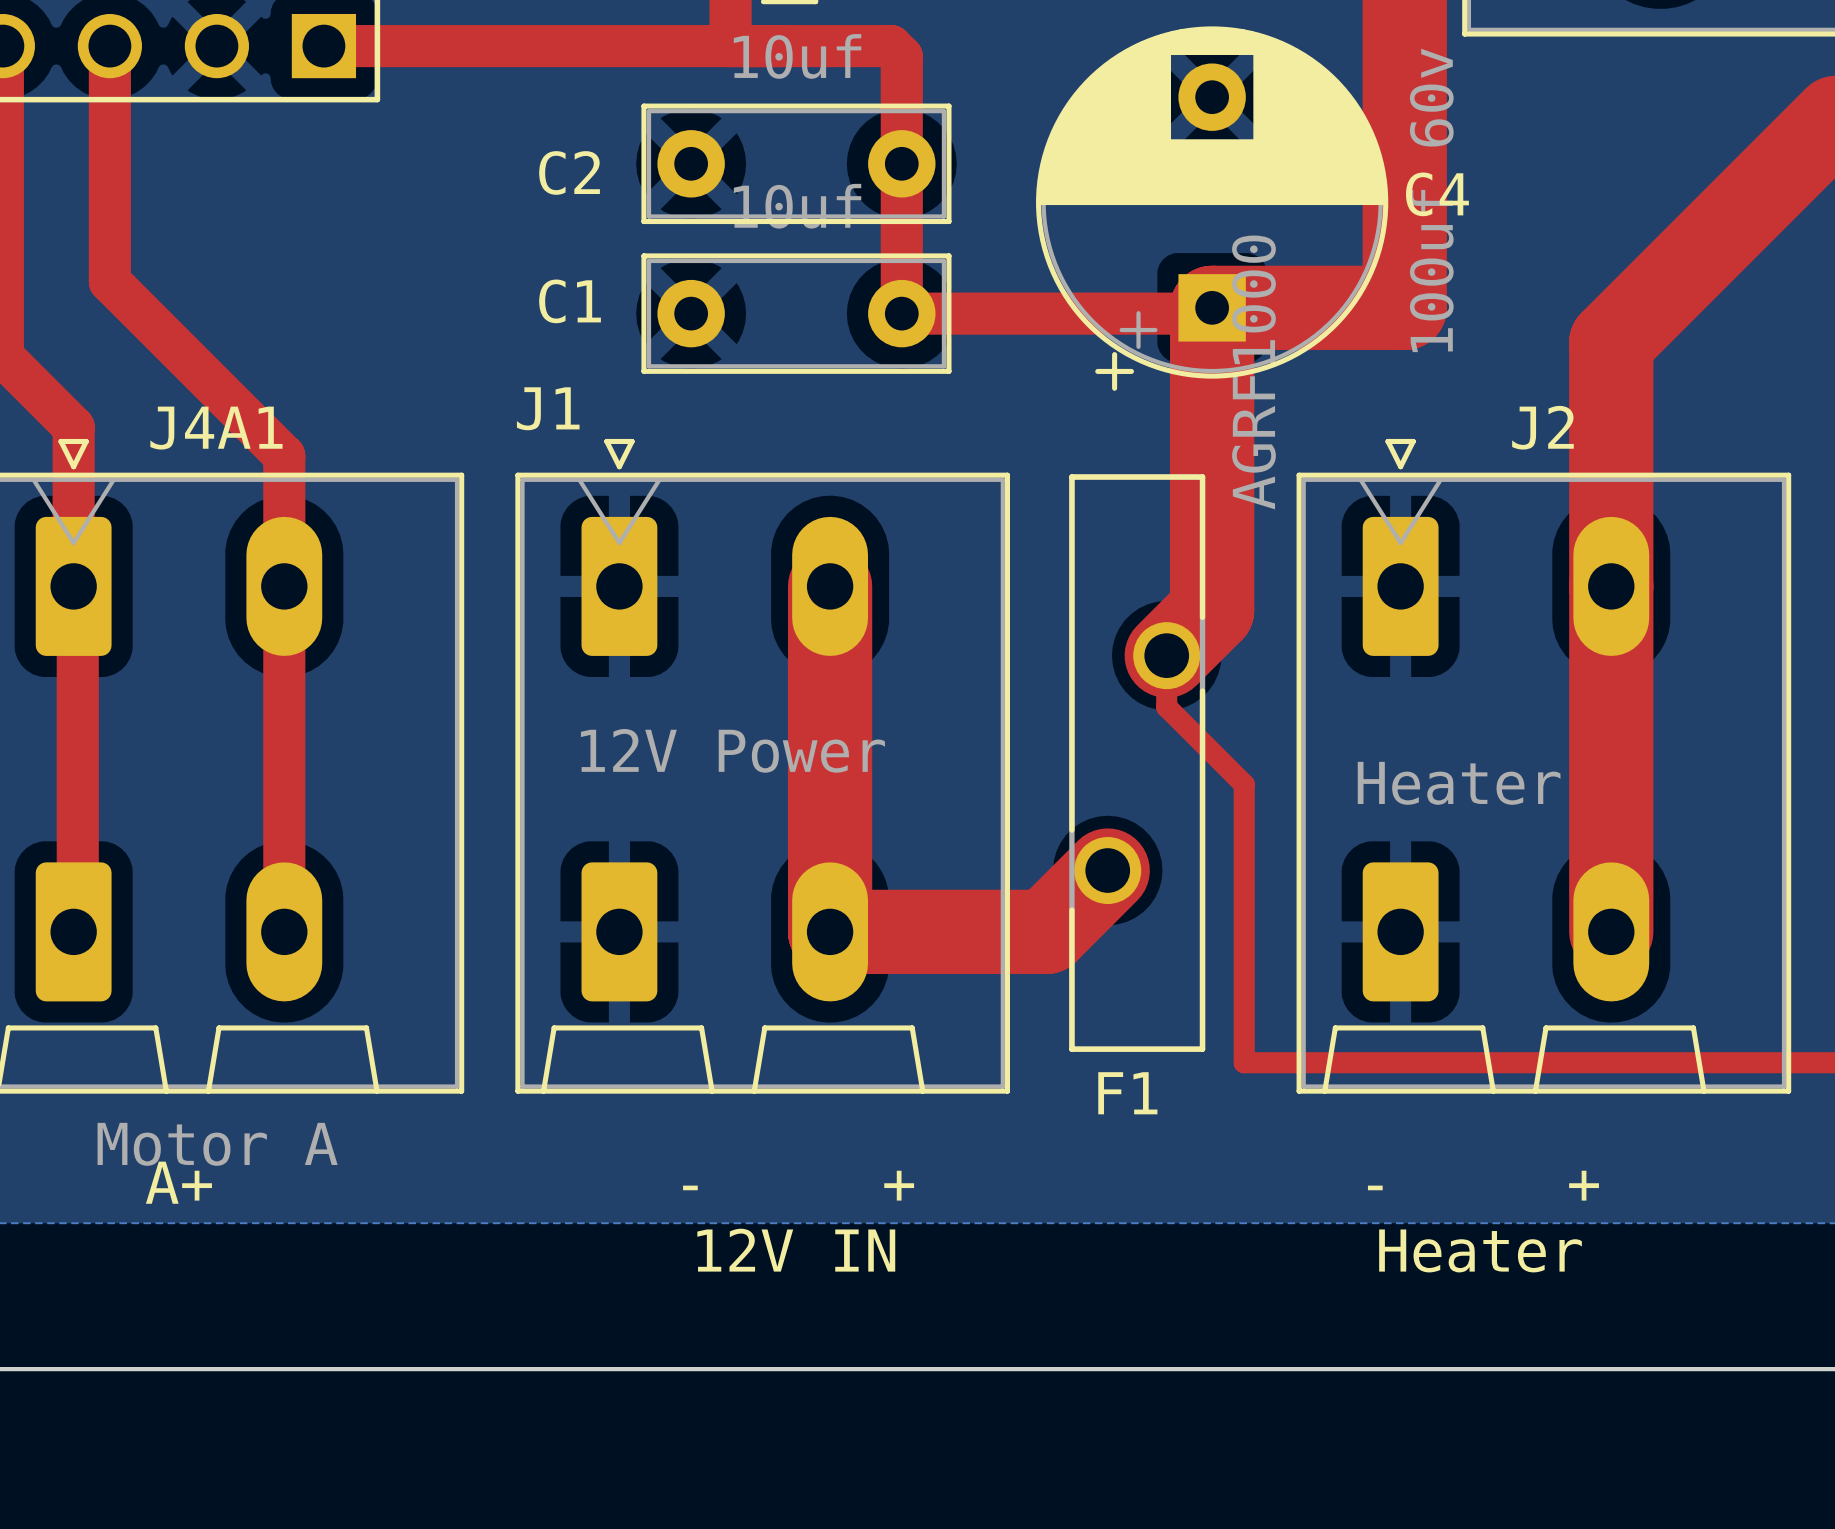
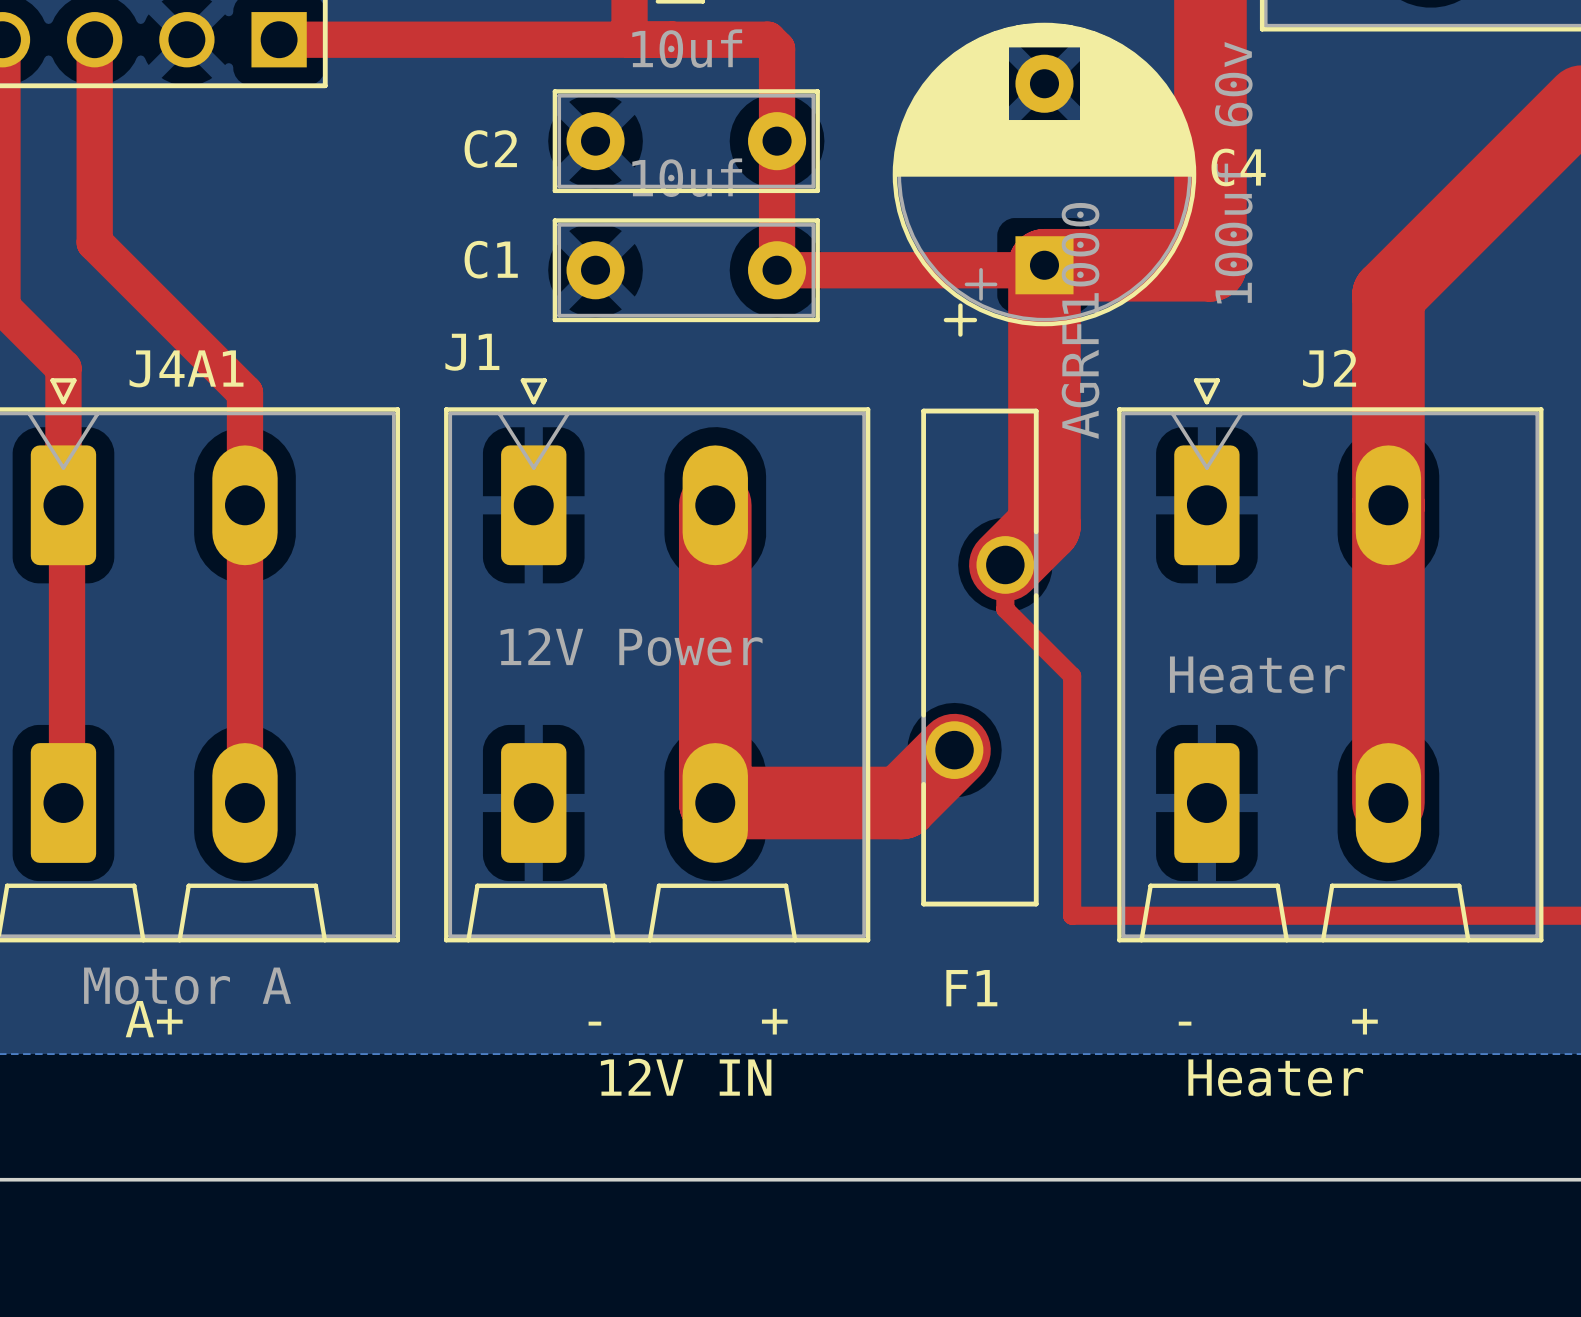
F1 name position: F1 (1127, 1093) -> F1 (971, 988)

